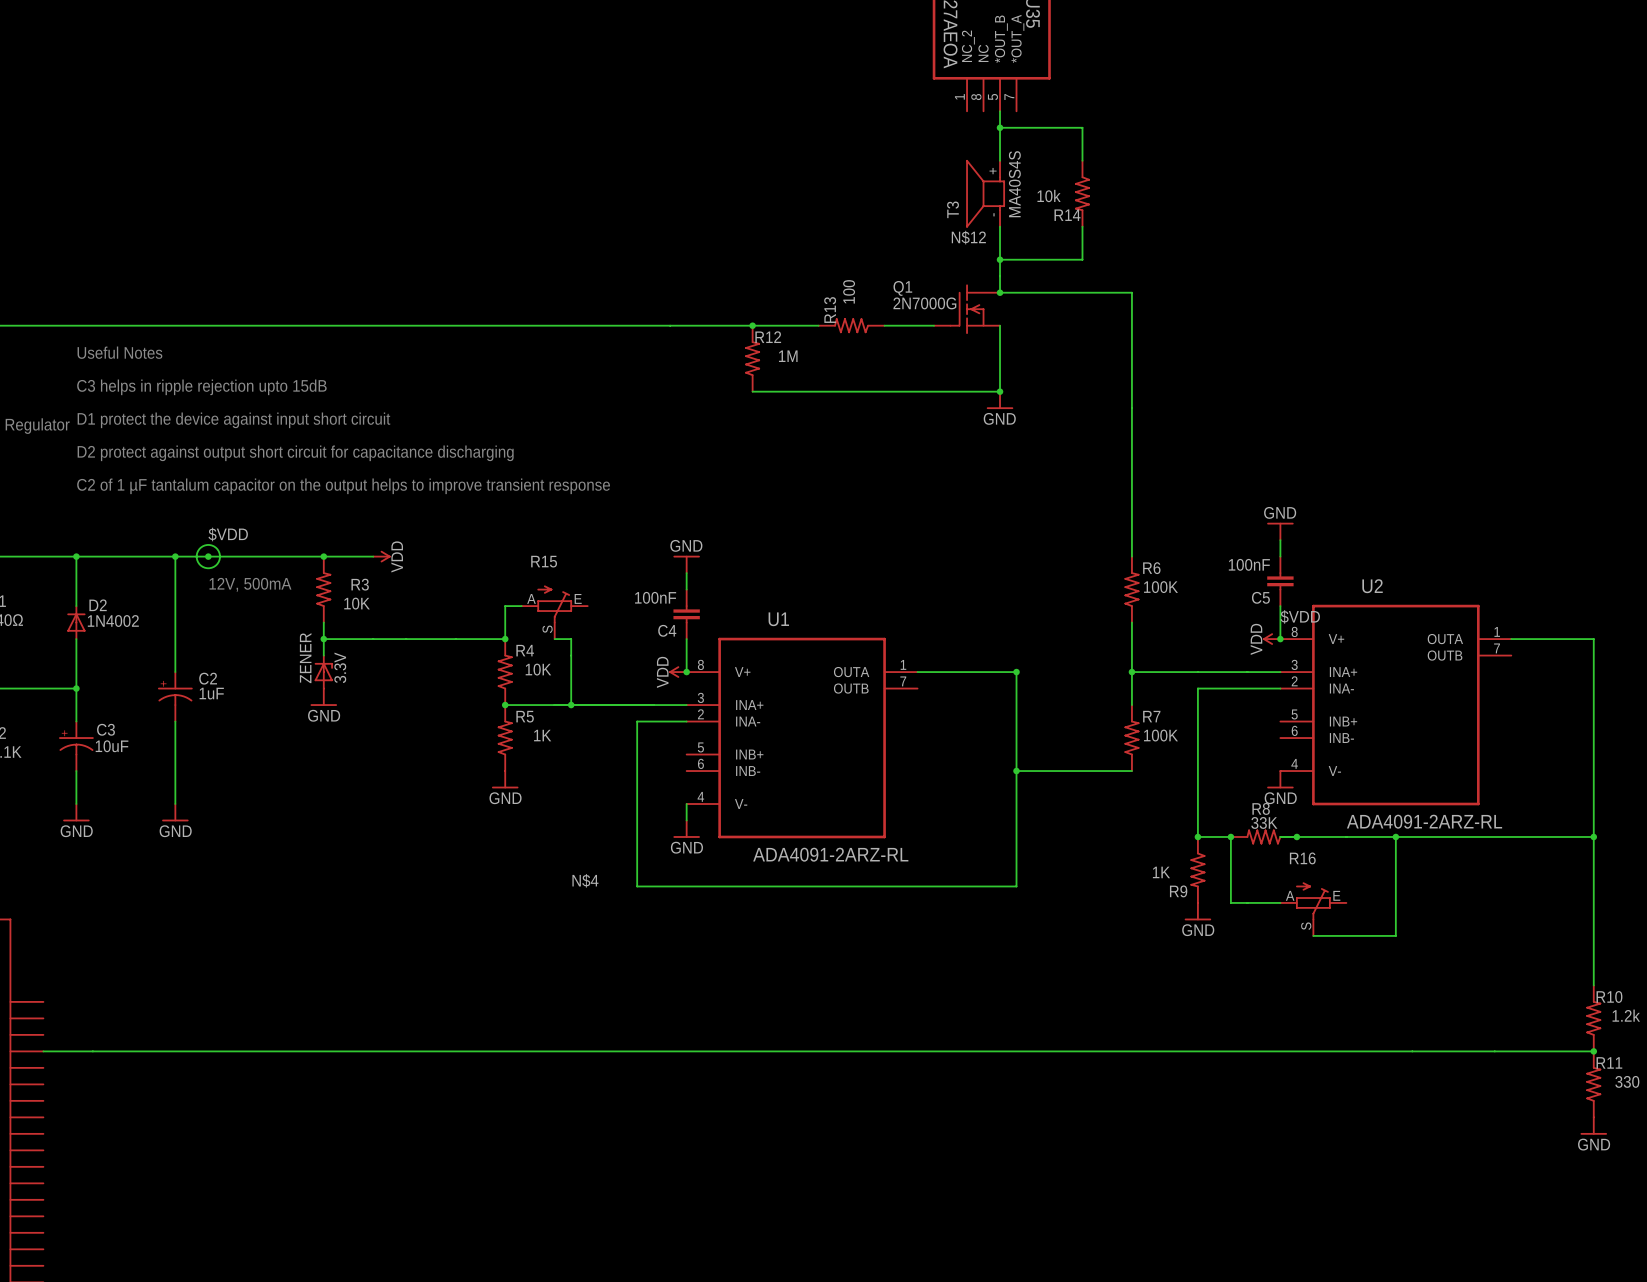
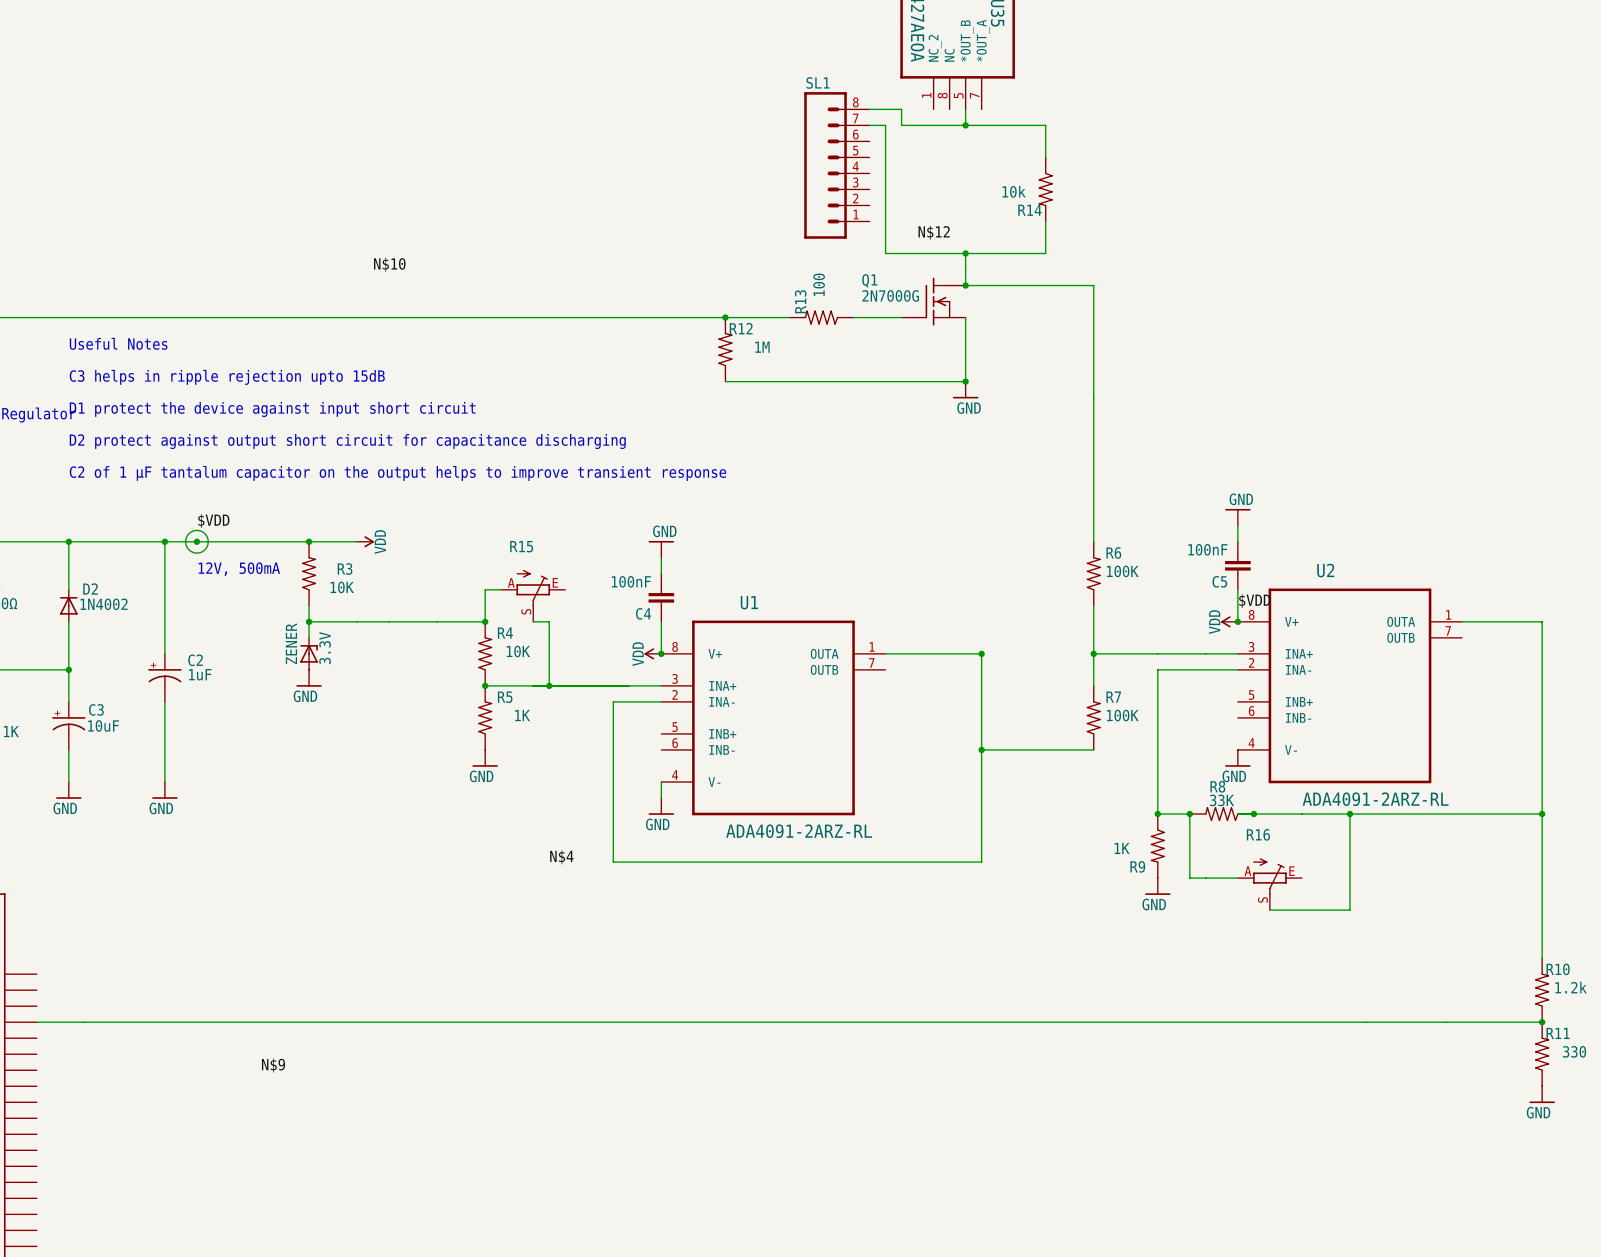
wire: (1000, 127) (1000, 160) -> (965, 125) (901, 125) (901, 109) (869, 109)
SL1: none -> (836, 165)
T3: MA40S4S (985, 193) -> none
wire: (1000, 226) (1000, 259) -> (869, 125) (885, 125) (885, 253) (965, 253)
label: none -> N$10 (389, 264)
label: none -> N$9 (273, 1065)

